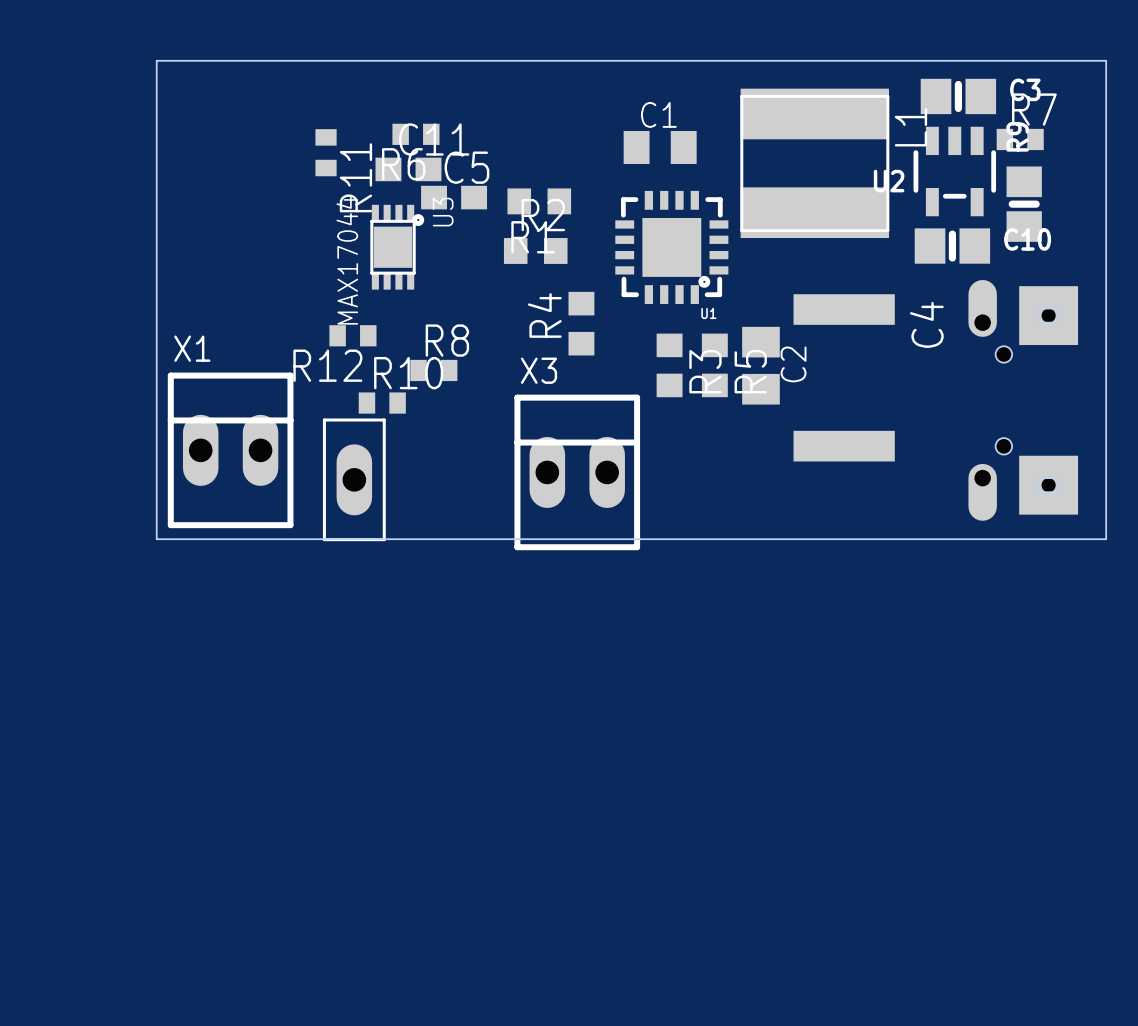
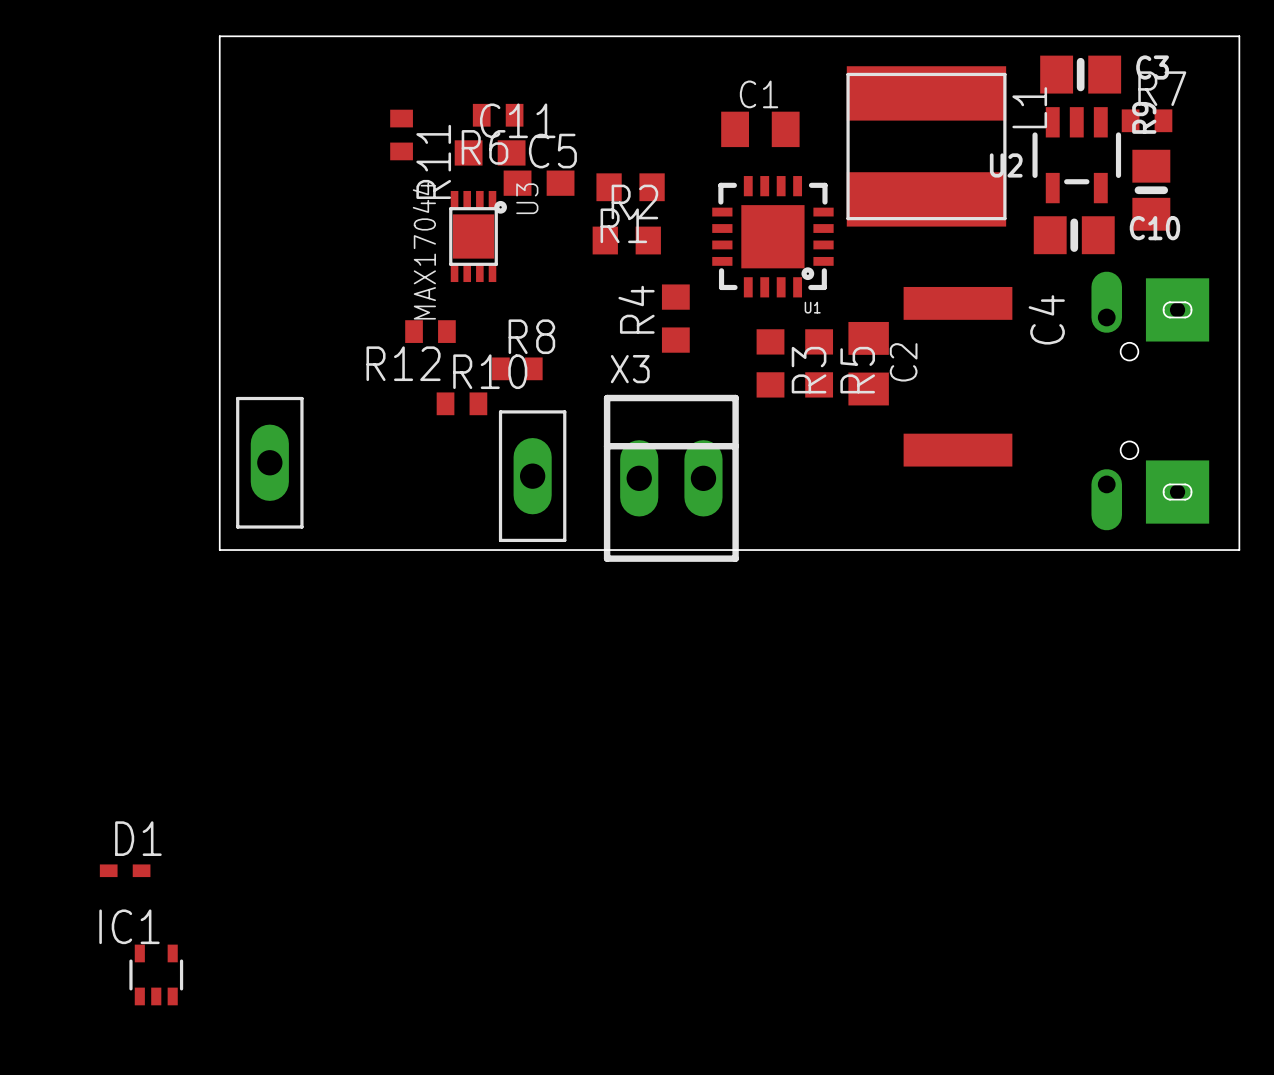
X1: (230, 450) -> none
part: none -> (269, 462)
part: none -> (532, 476)
part: (354, 479) -> none
D1: none -> (125, 870)
IC1: none -> (156, 974)

